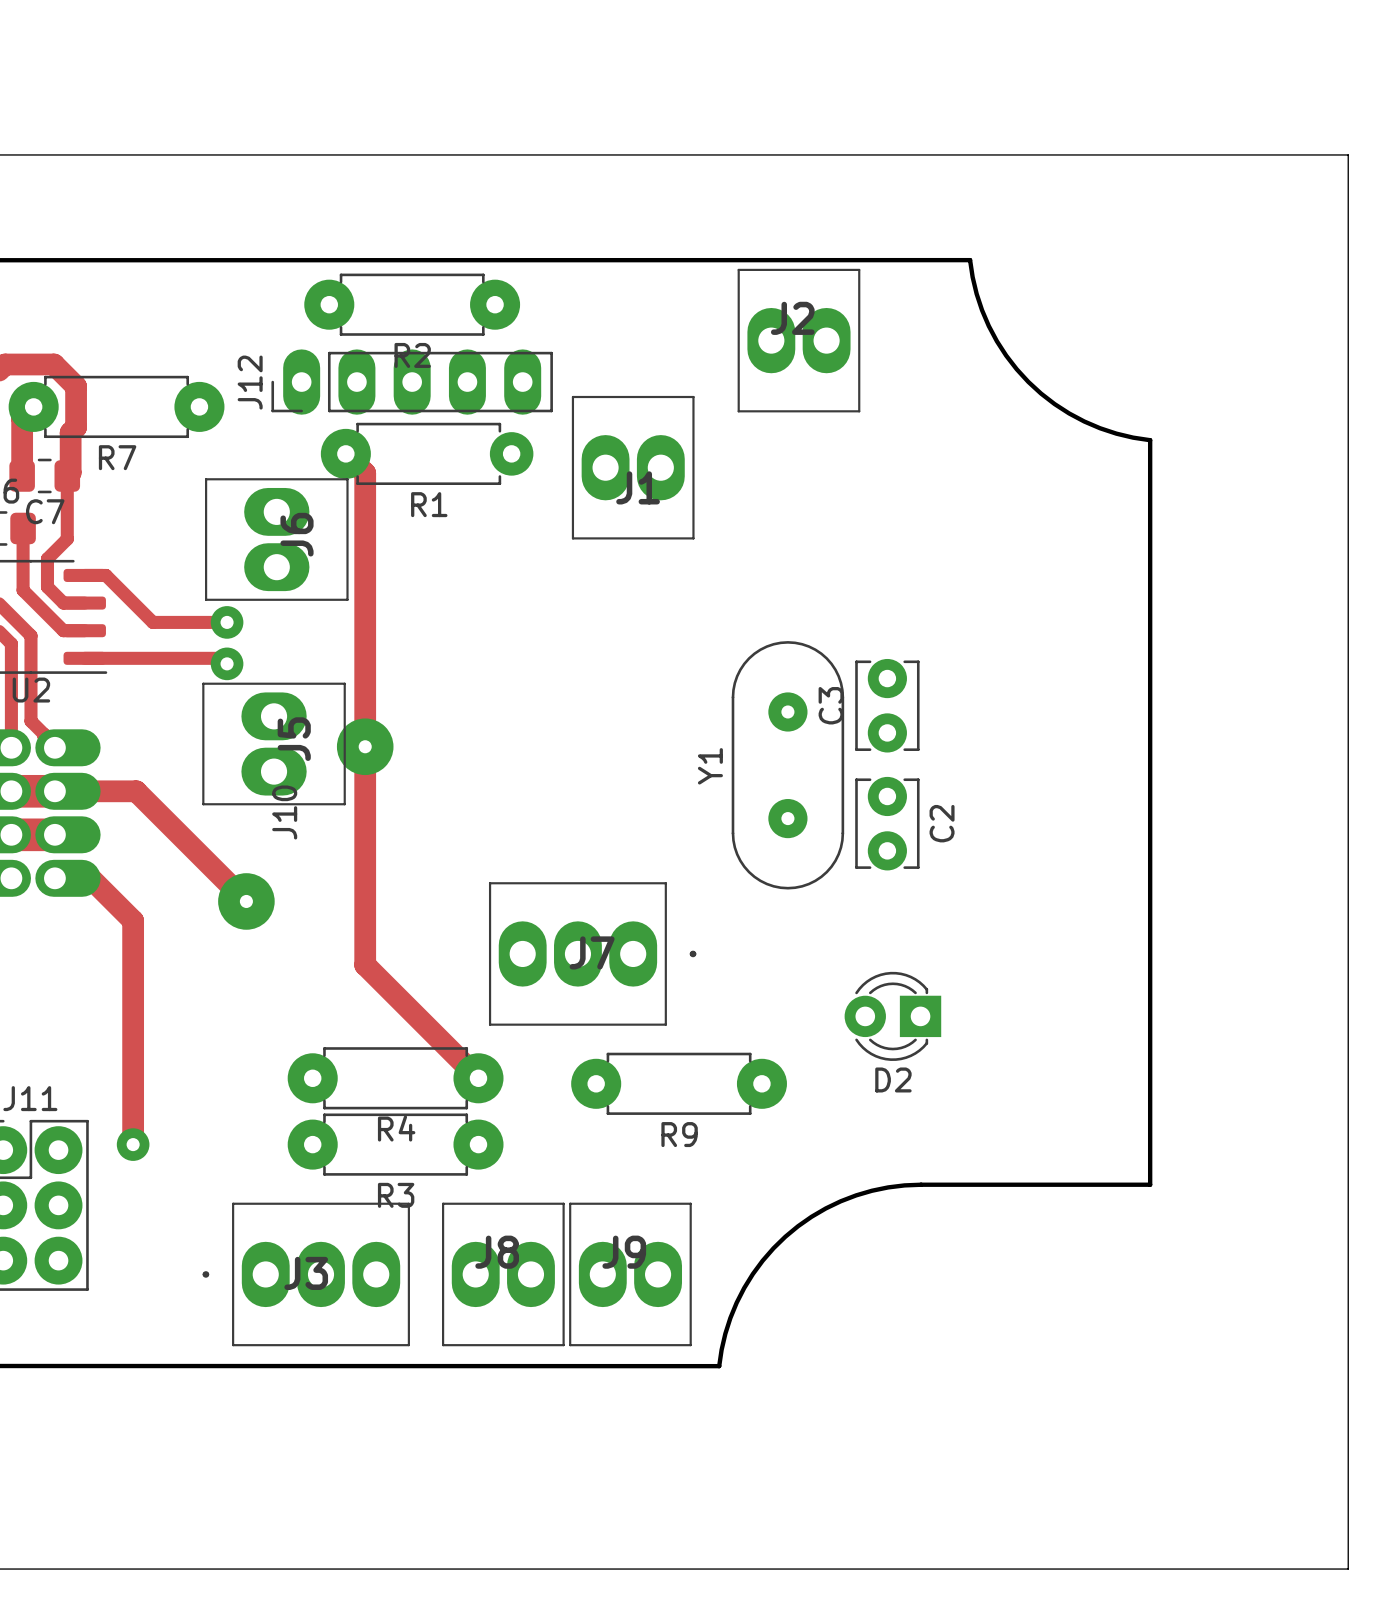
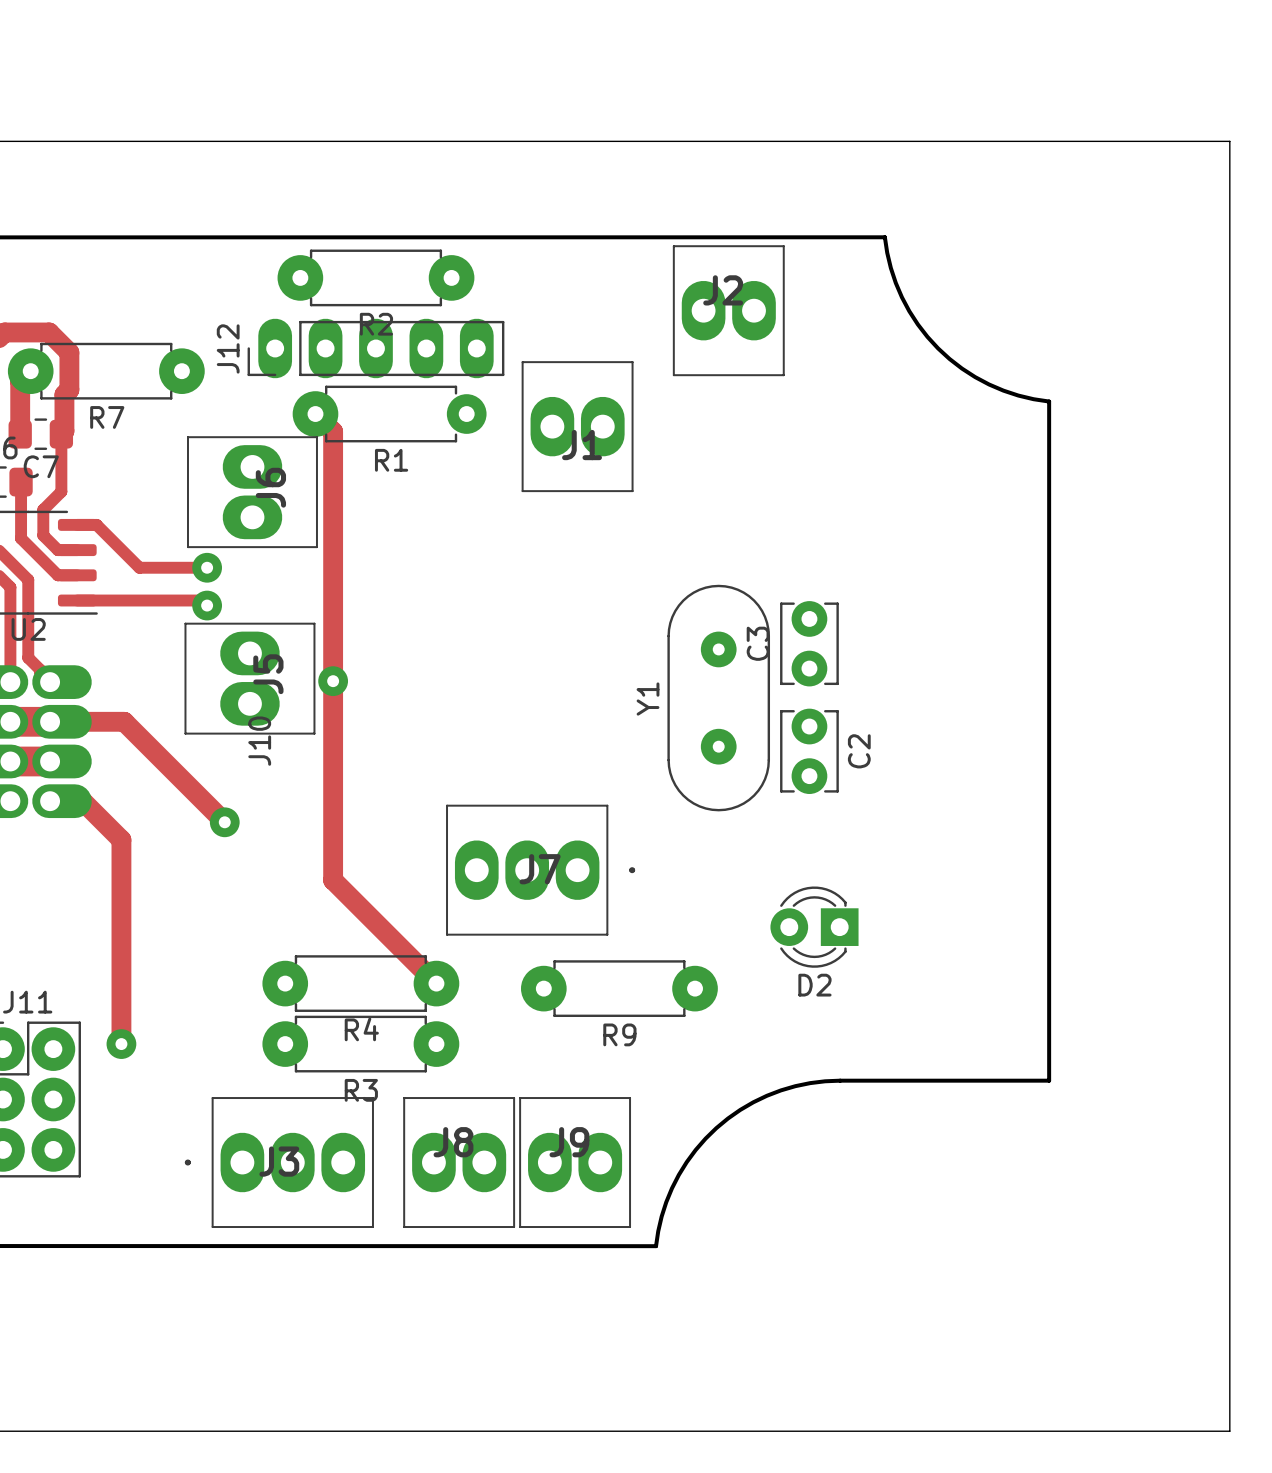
part footprint: [336, 718, 394, 776] -> [318, 666, 349, 697]
part footprint: [218, 873, 275, 930] -> [209, 807, 240, 838]

